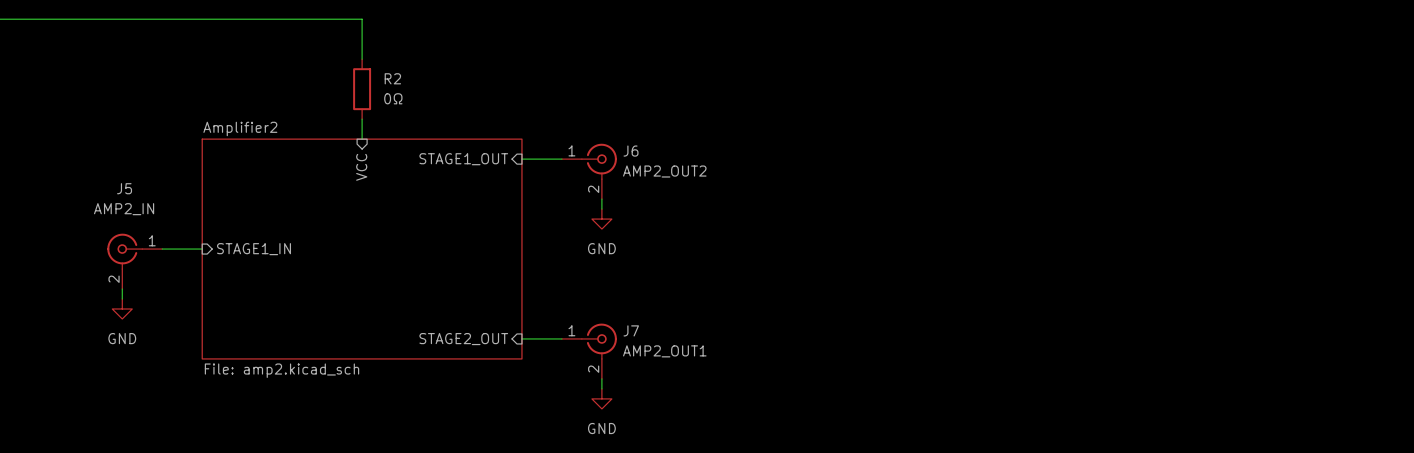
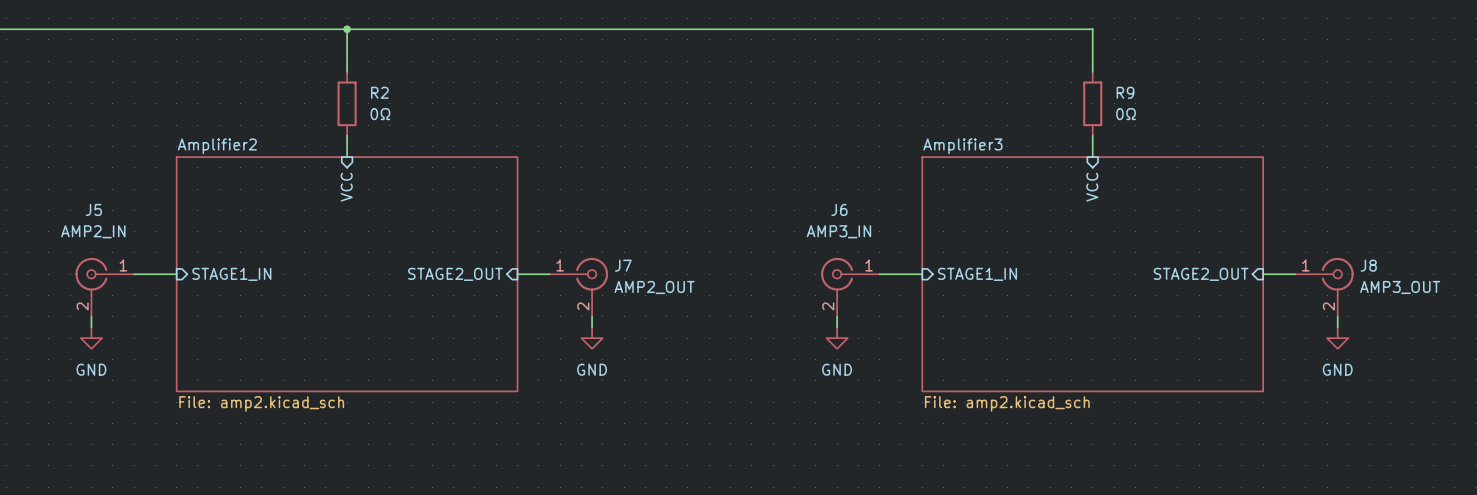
wire: none -> (347, 29) (1092, 29) (1092, 71)
junction: none -> (347, 29)
R9: none -> 0Ω (1092, 103)
wire: none -> (1092, 135) (1092, 157)
J6 name position: J6 (631, 151) -> J6 (839, 209)
sheet pin: STAGE1_OUT (463, 159) -> none
wire: (521, 159) (561, 159) -> none
J6 flip: as is (599, 161) -> left-right (839, 276)
sheet pin: none -> VCC (1092, 187)
J6 position: (589, 171) -> (850, 287)
J6 value: AMP2_OUT2 (664, 171) -> AMP3_IN (838, 231)
wire: (601, 199) (601, 209) -> (592, 316) (592, 327)
power symbol: GND (601, 219) -> none
wire: none -> (517, 274) (549, 274)
wire: none -> (879, 274) (922, 274)
sheet pin: none -> STAGE1_IN (977, 274)
sheet Amplifier3: none -> File: amp2.kicad_sch (1092, 274)
sheet pin: none -> STAGE2_OUT (1201, 274)
wire: none -> (1263, 274) (1295, 274)
J8: none -> AMP3_OUT (1324, 287)
wire: none -> (837, 316) (837, 327)
wire: none -> (1337, 316) (1337, 327)
power symbol: none -> GND (592, 338)
power symbol: none -> GND (837, 338)
power symbol: none -> GND (1337, 338)
wire: (521, 338) (561, 338) -> none
sheet pin position: STAGE2_OUT (463, 339) -> STAGE2_OUT (455, 274)
J7 position: (589, 351) -> (578, 287)
J7 value: AMP2_OUT1 (664, 351) -> AMP2_OUT (654, 287)
wire: (601, 378) (601, 388) -> none
power symbol: GND (601, 398) -> none

